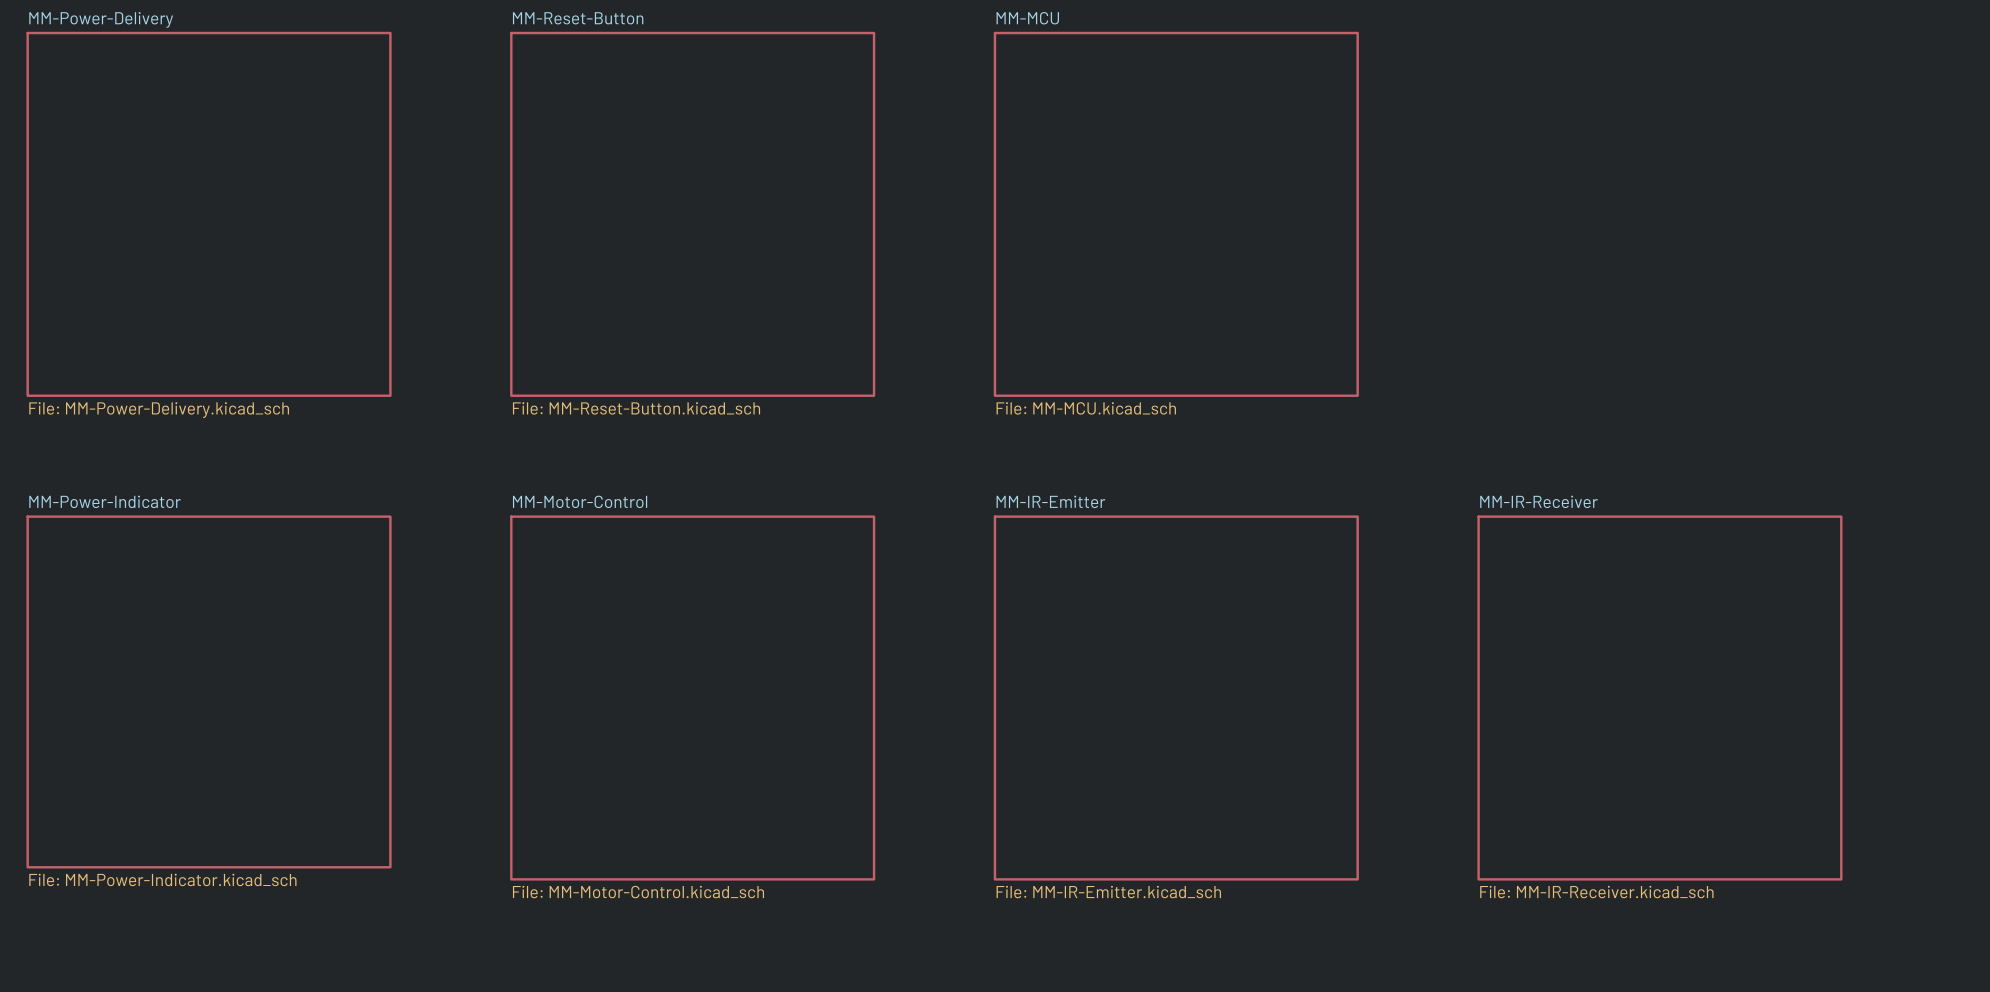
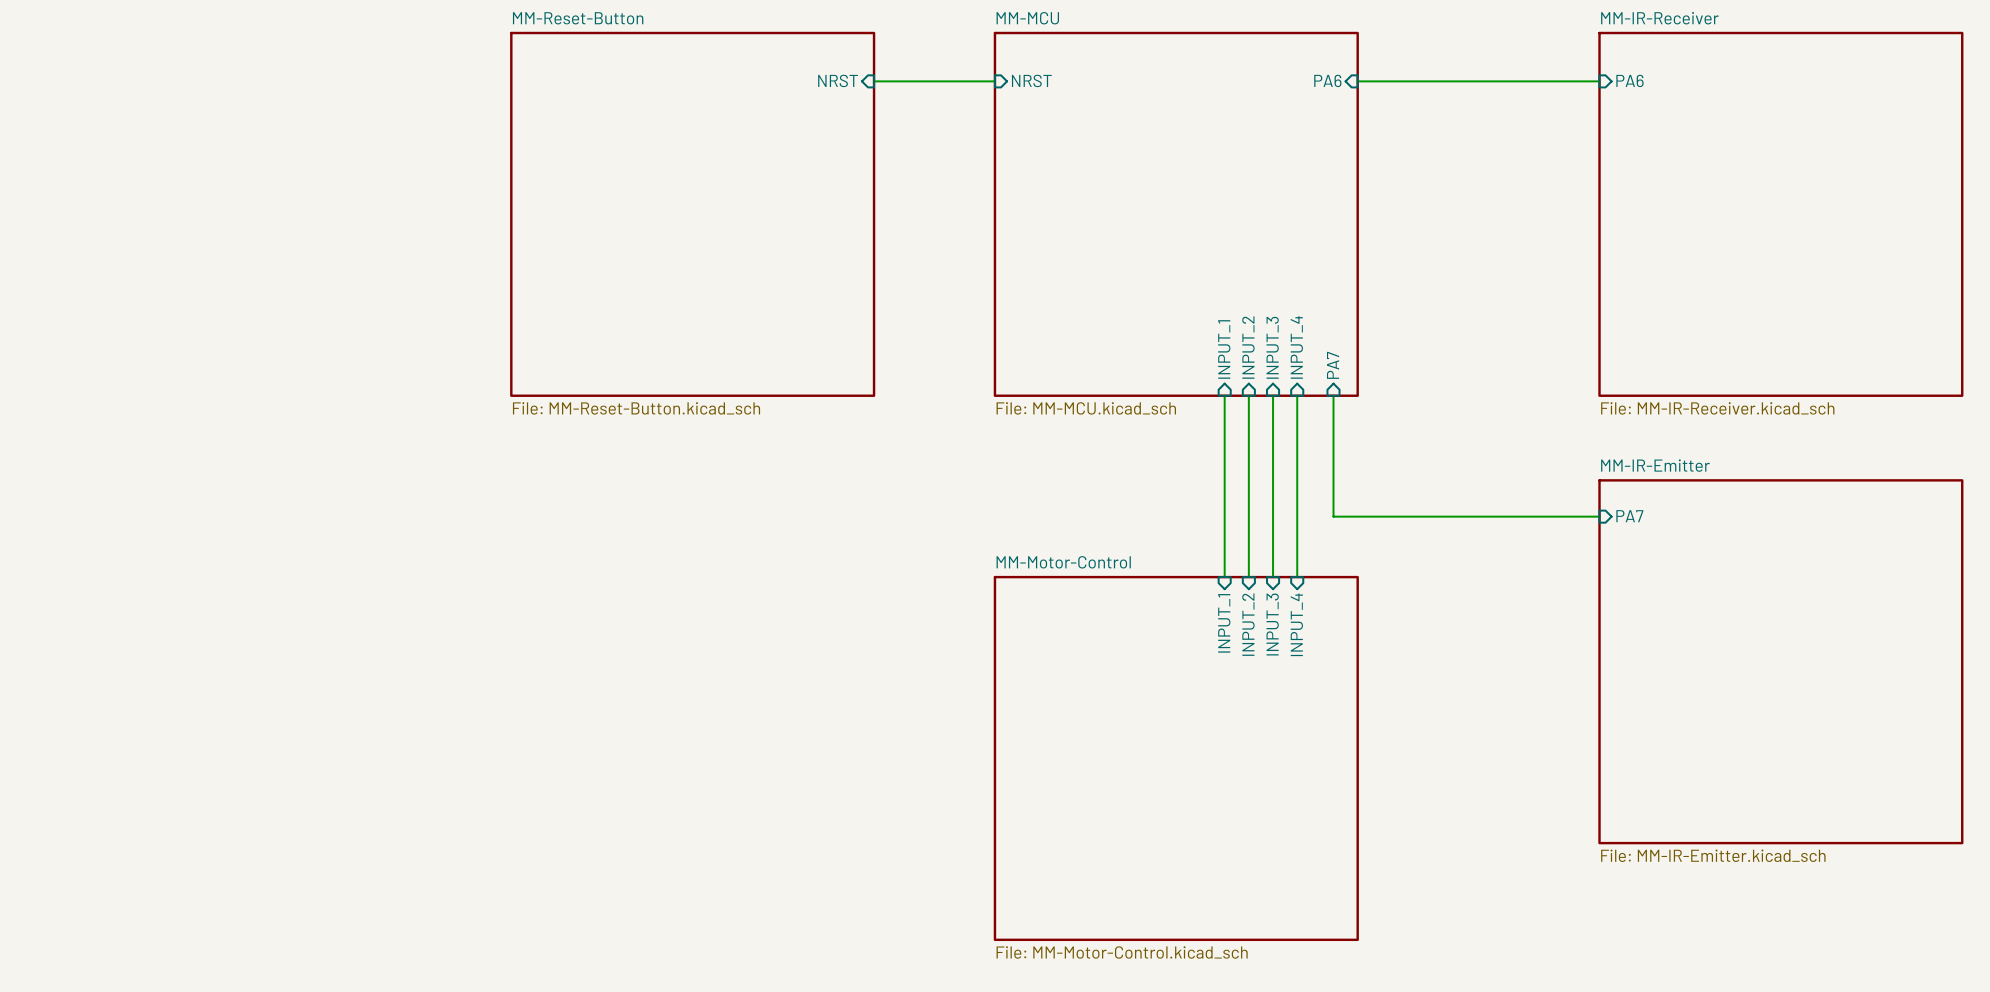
sheet pin: none -> NRST (838, 80)
sheet pin: none -> NRST (1031, 80)
sheet pin: none -> PA6 (1327, 80)
sheet pin: none -> PA6 (1629, 80)
wire: none -> (874, 81) (994, 81)
wire: none -> (1357, 81) (1599, 81)
sheet MM-Power-Delivery: File: MM-Power-Delivery.kicad_sch (209, 214) -> none
sheet MM-IR-Receiver: none -> File: MM-IR-Receiver.kicad_sch (1780, 214)
sheet pin: none -> INPUT_2 (1248, 347)
sheet pin: none -> INPUT_3 (1272, 347)
sheet pin: none -> INPUT_4 (1296, 347)
sheet pin: none -> INPUT_1 (1224, 349)
sheet pin: none -> PA7 (1333, 365)
wire: none -> (1224, 395) (1224, 577)
wire: none -> (1248, 395) (1248, 577)
wire: none -> (1273, 395) (1273, 577)
wire: none -> (1297, 395) (1297, 577)
wire: none -> (1333, 395) (1333, 516) (1599, 516)
sheet pin: none -> PA7 (1629, 516)
sheet pin: none -> INPUT_1 (1224, 623)
sheet pin: none -> INPUT_2 (1248, 624)
sheet pin: none -> INPUT_3 (1272, 624)
sheet pin: none -> INPUT_4 (1296, 624)
sheet MM-IR-Emitter: none -> File: MM-IR-Emitter.kicad_sch (1780, 661)
sheet MM-Power-Indicator: File: MM-Power-Indicator.kicad_sch (209, 691) -> none
sheet MM-Motor-Control: File: MM-Motor-Control.kicad_sch (692, 698) -> none
sheet MM-IR-Emitter: File: MM-IR-Emitter.kicad_sch (1176, 698) -> none
sheet MM-IR-Receiver: File: MM-IR-Receiver.kicad_sch (1659, 698) -> none
sheet MM-Motor-Control: none -> File: MM-Motor-Control.kicad_sch (1176, 758)

